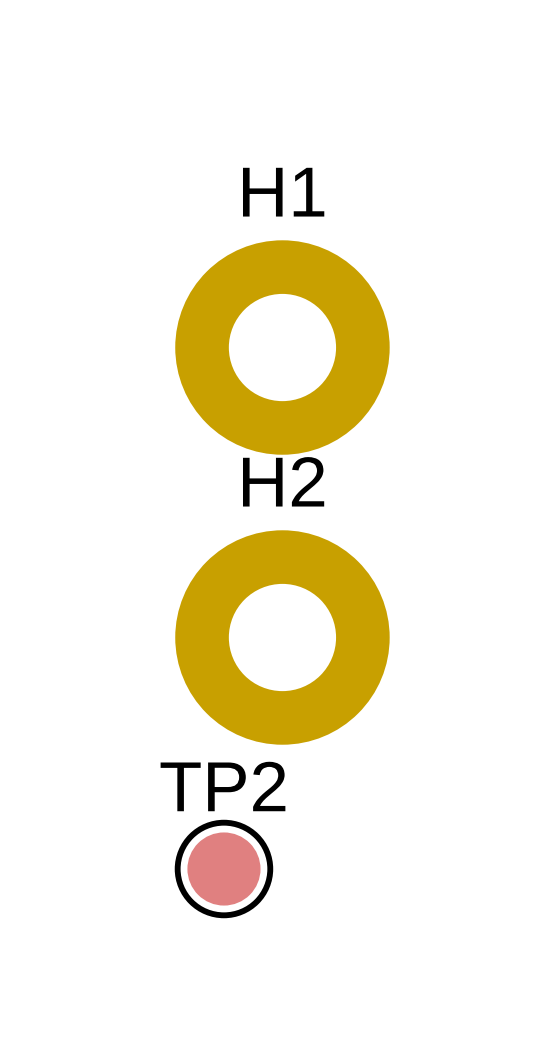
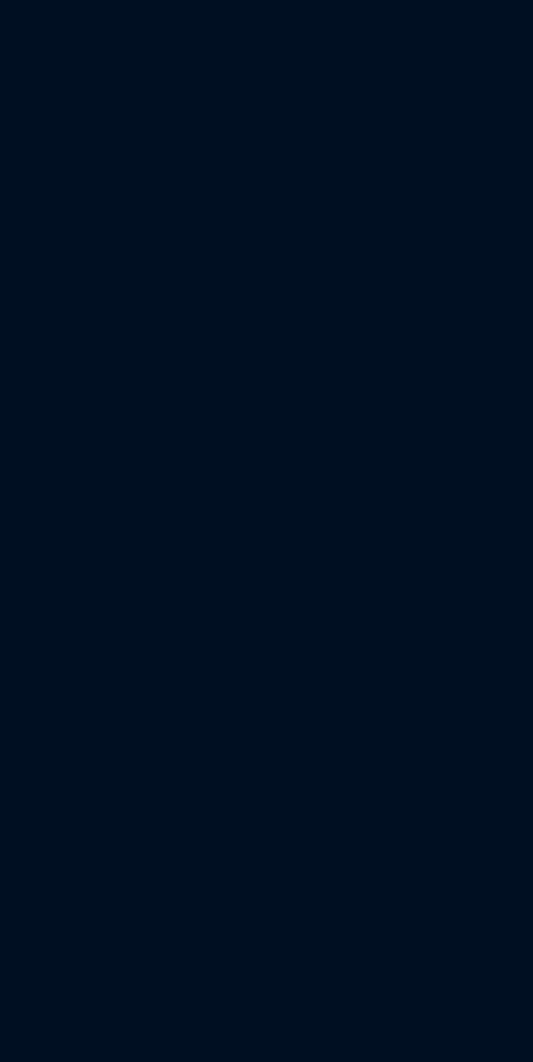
H1: (282, 347) -> none
H2: (282, 637) -> none
TP2: (223, 869) -> none

